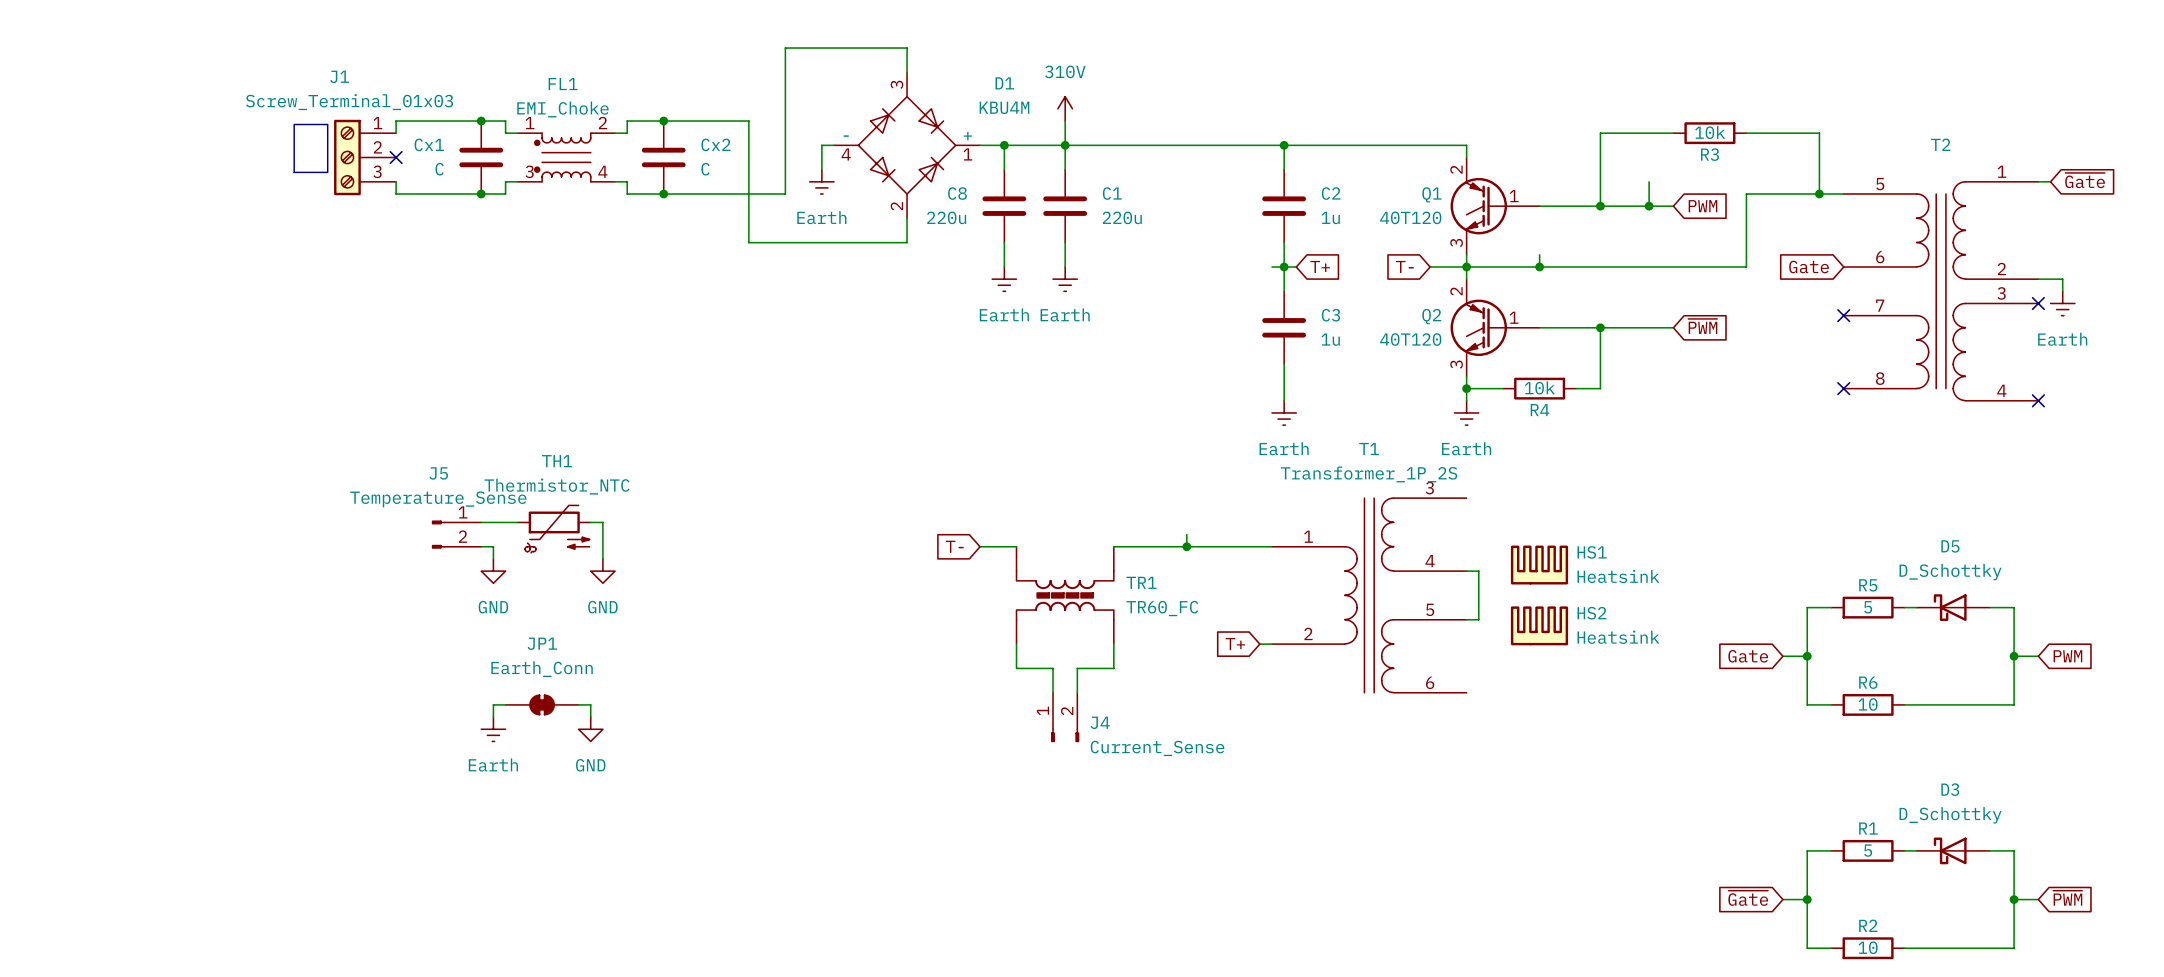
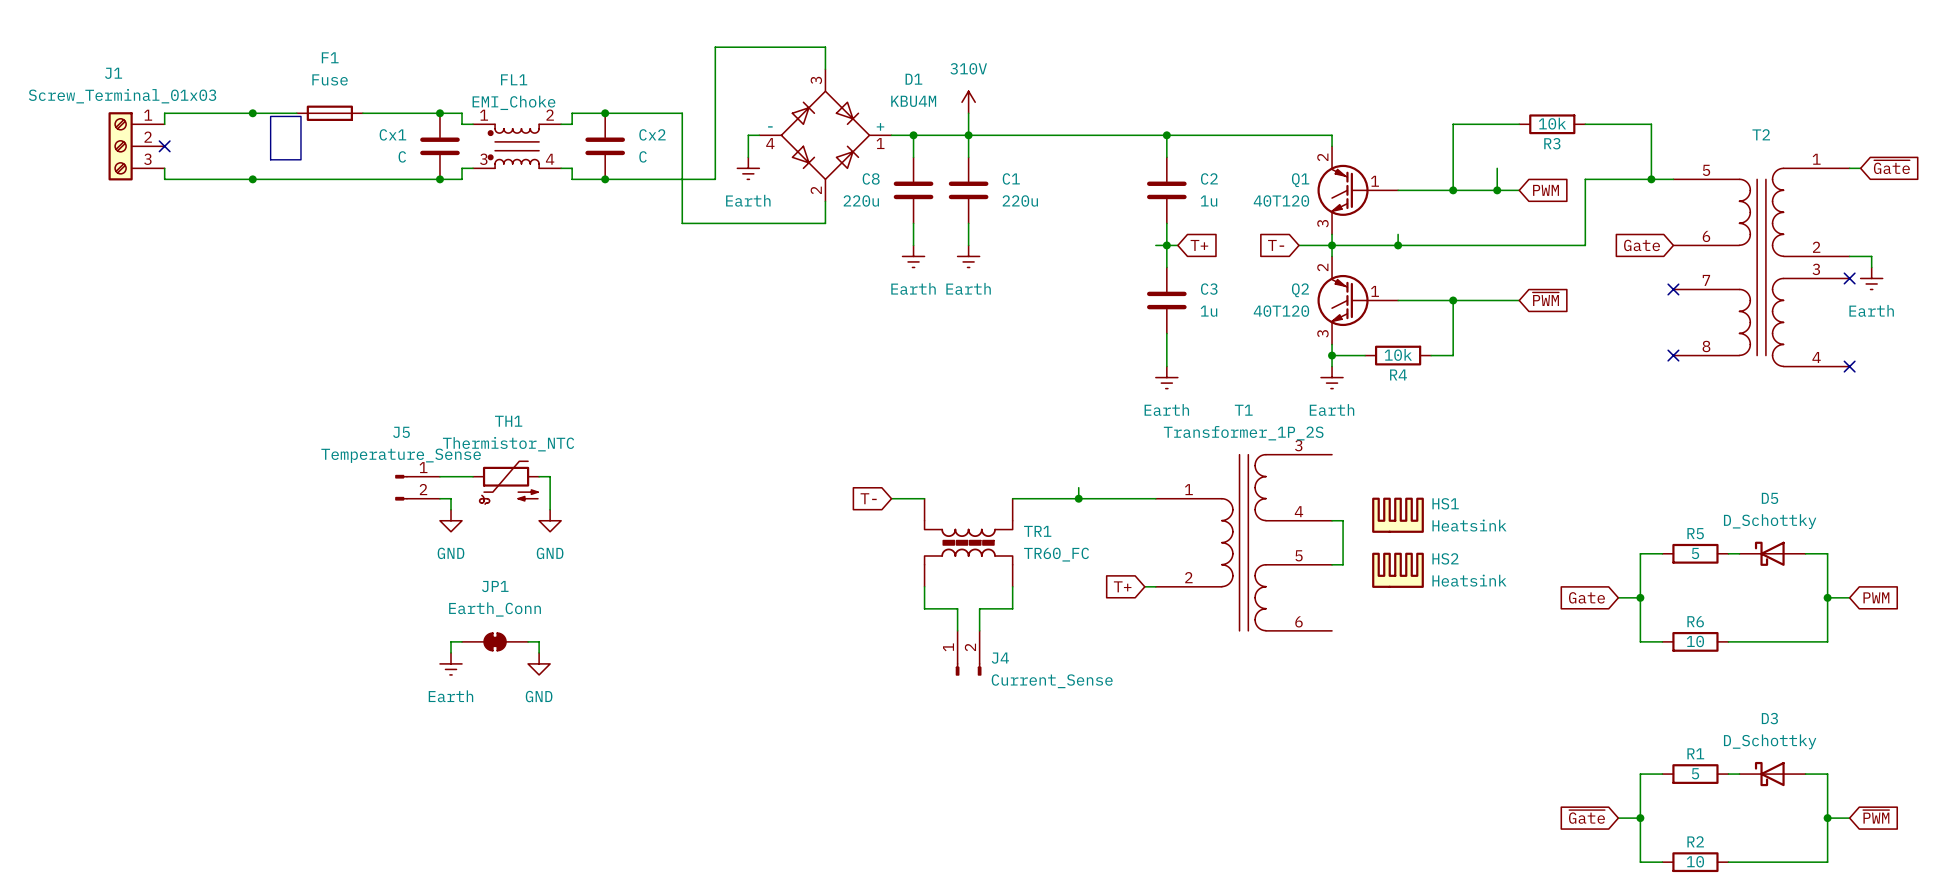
junction: none -> (252, 113)
wire: none -> (296, 113) (164, 113) (164, 124)
F1: none -> Fuse (329, 113)
wire: (396, 121) (396, 133) -> none
no-connect mark: none -> (164, 146)
J1 position: (365, 157) -> (136, 146)
no-connect mark: (396, 157) -> none
wire: (396, 181) (396, 194) -> (164, 168) (164, 179) (362, 179)
junction: none -> (252, 179)

